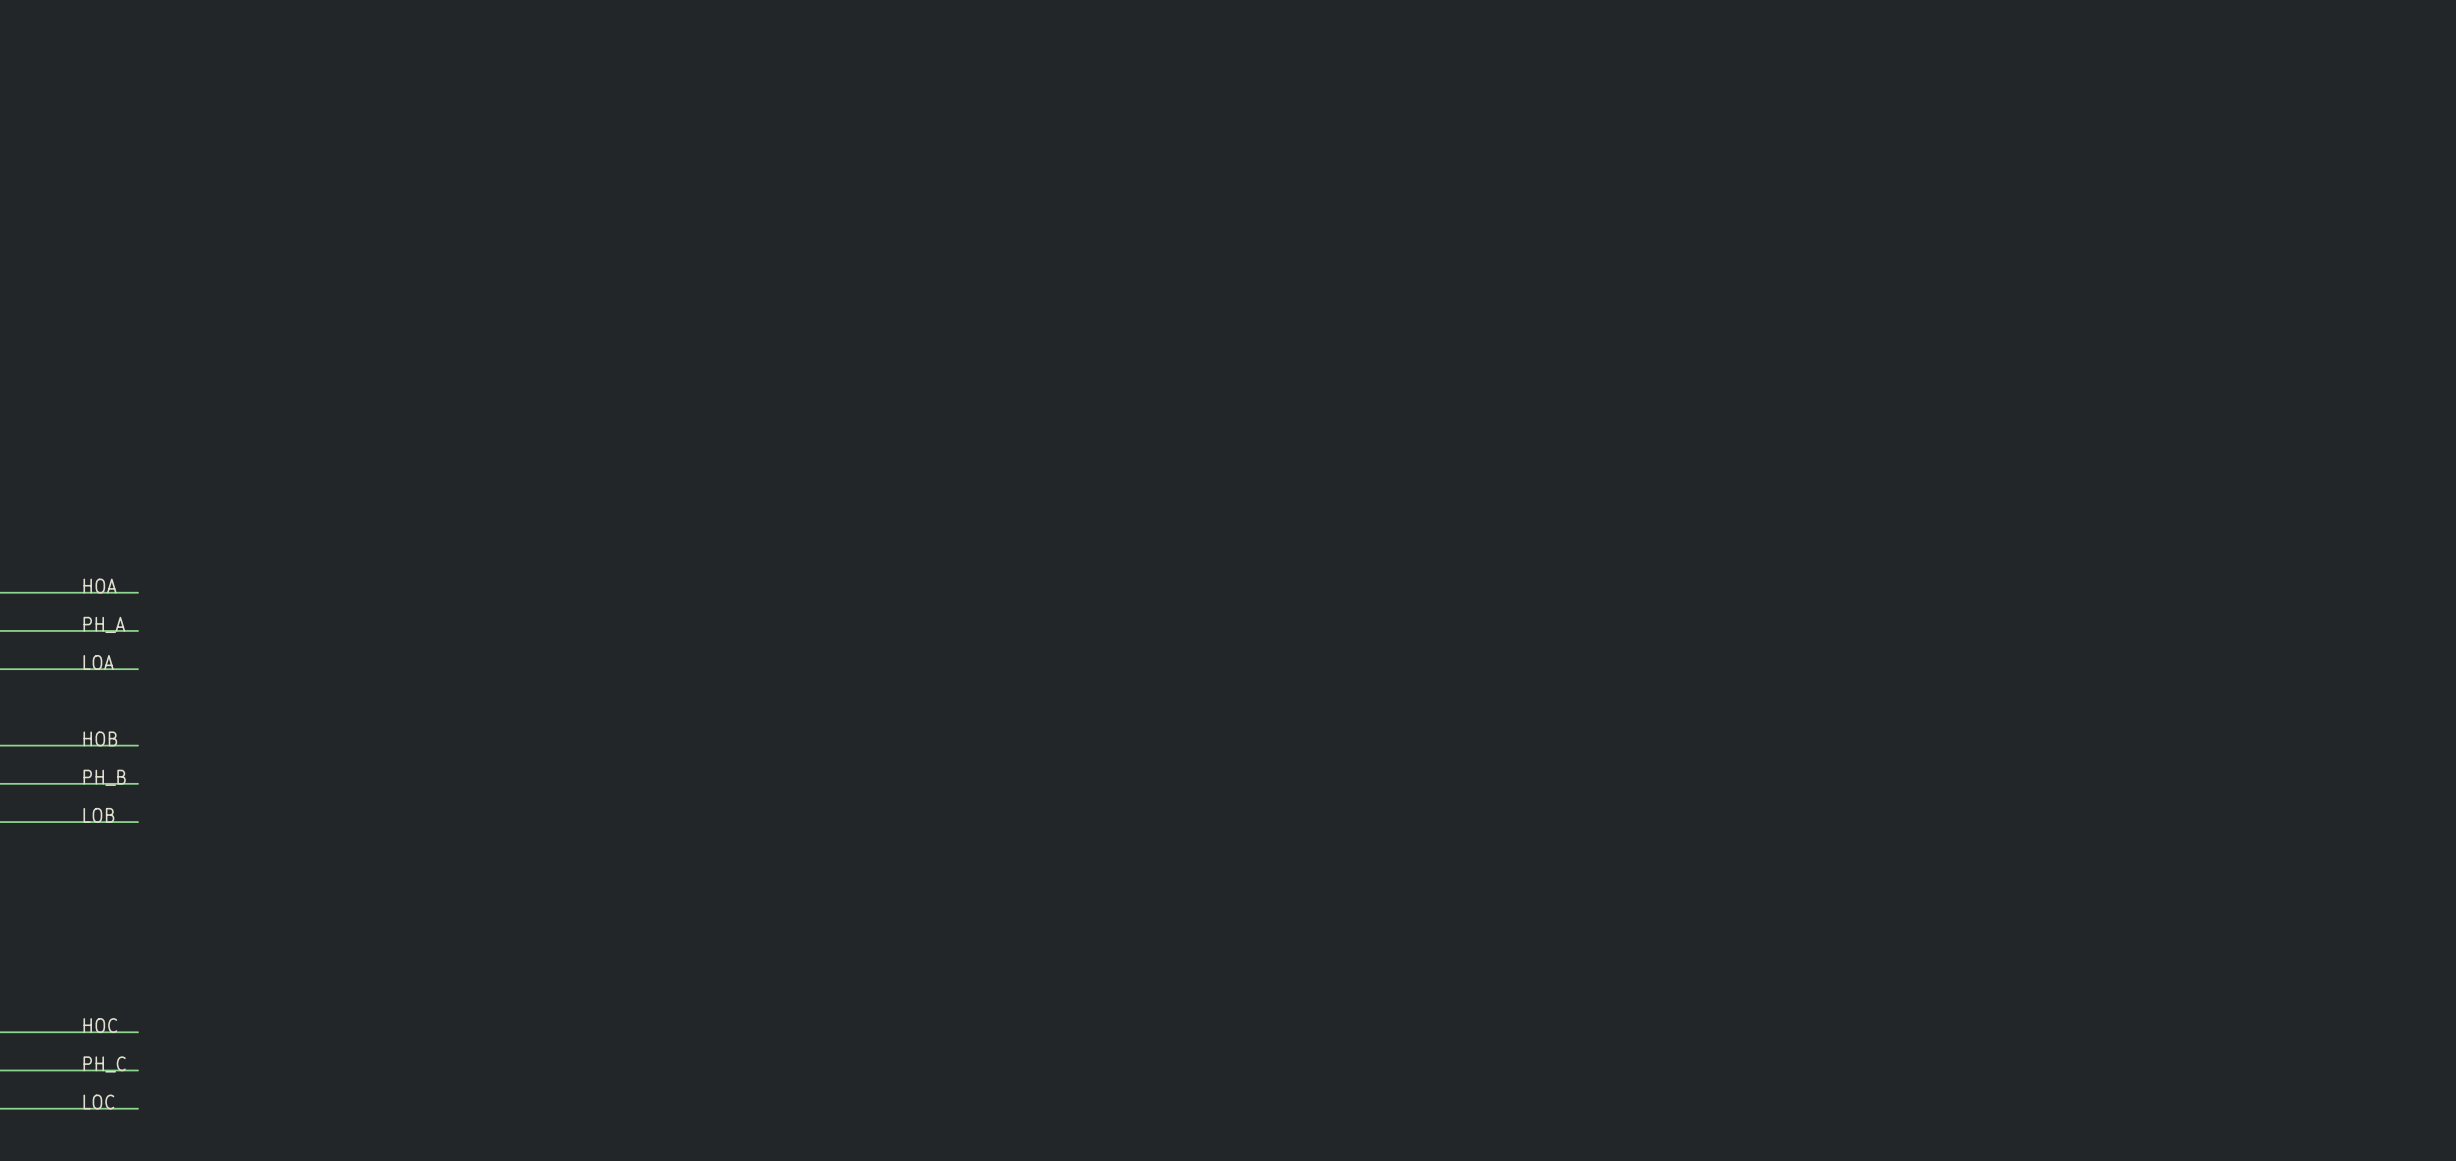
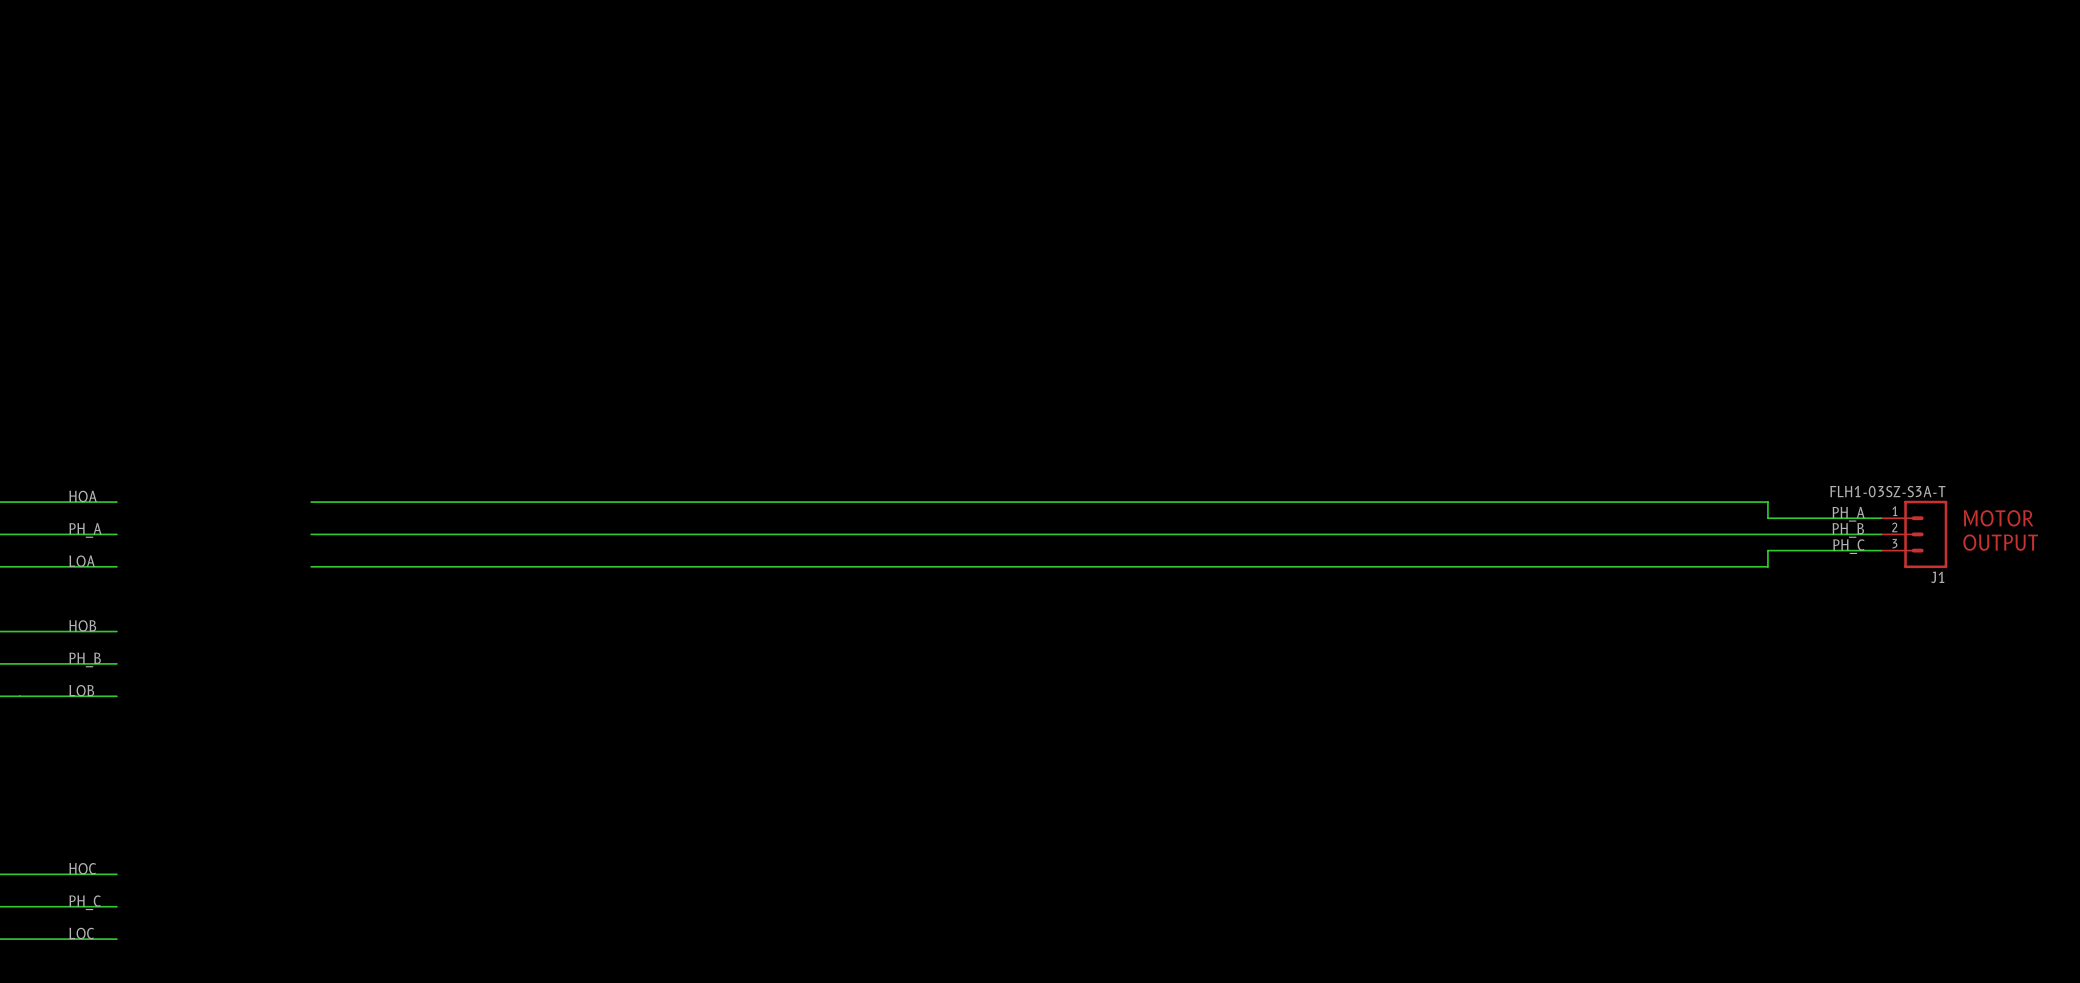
wire: none -> (311, 502) (1767, 502) (1767, 518) (1881, 518)
label: none -> PH_A (1848, 514)
text: none -> MOTOR (1998, 518)
label: none -> PH_B (1848, 530)
wire: none -> (311, 534) (1881, 534)
J1: none -> FLH1-03SZ-S3A-T (1914, 534)
text: none -> OUTPUT (2000, 542)
label: none -> PH_C (1848, 546)
wire: none -> (1881, 550) (1767, 550) (1767, 566) (311, 566)

